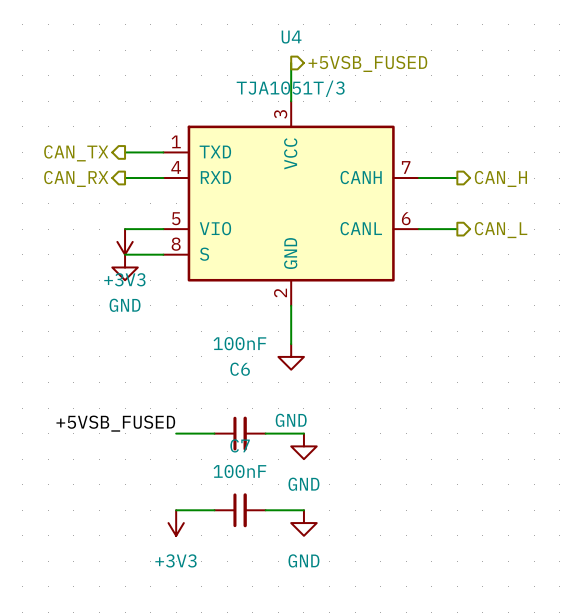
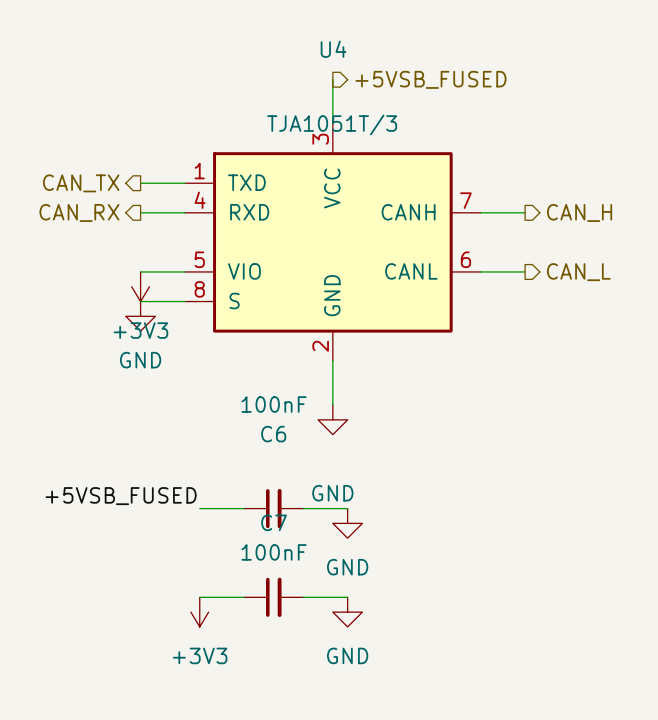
U4 value position: TJA1051T/3 (290, 88) -> TJA1051T/3 (332, 124)

